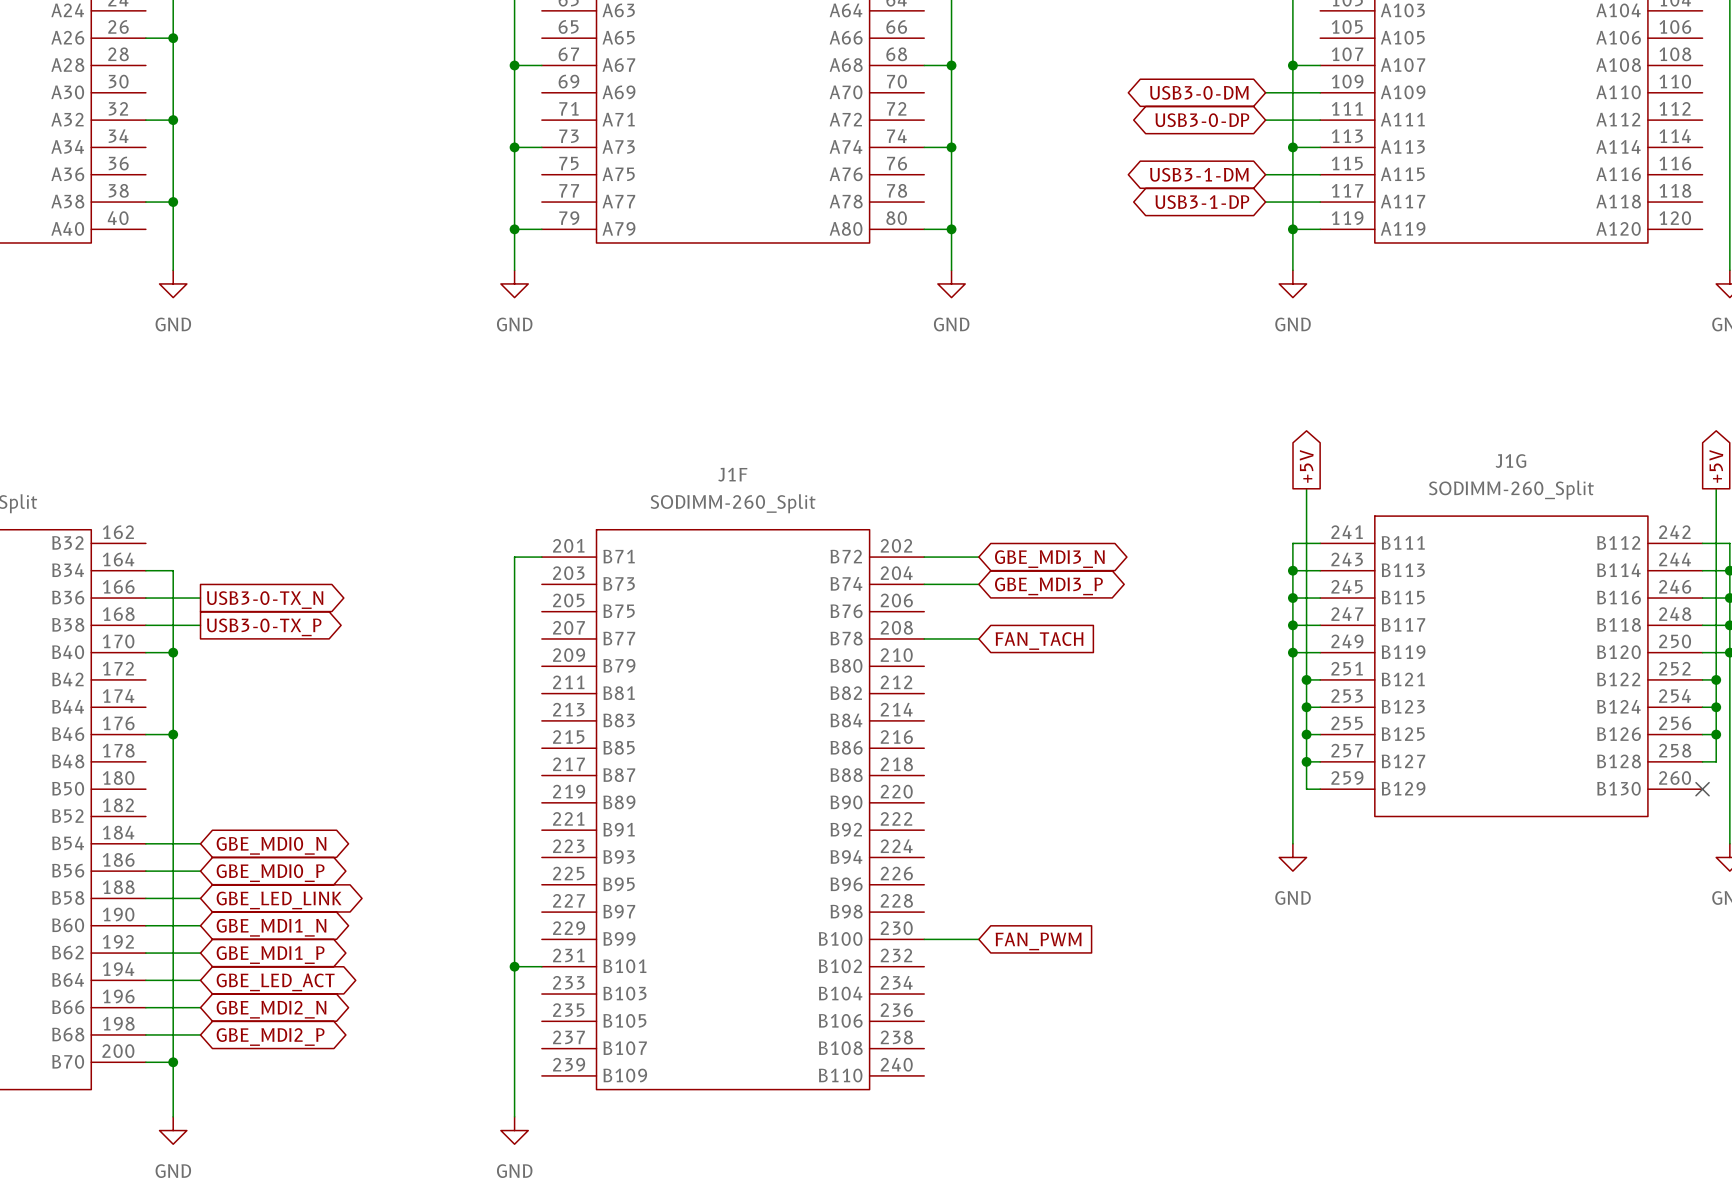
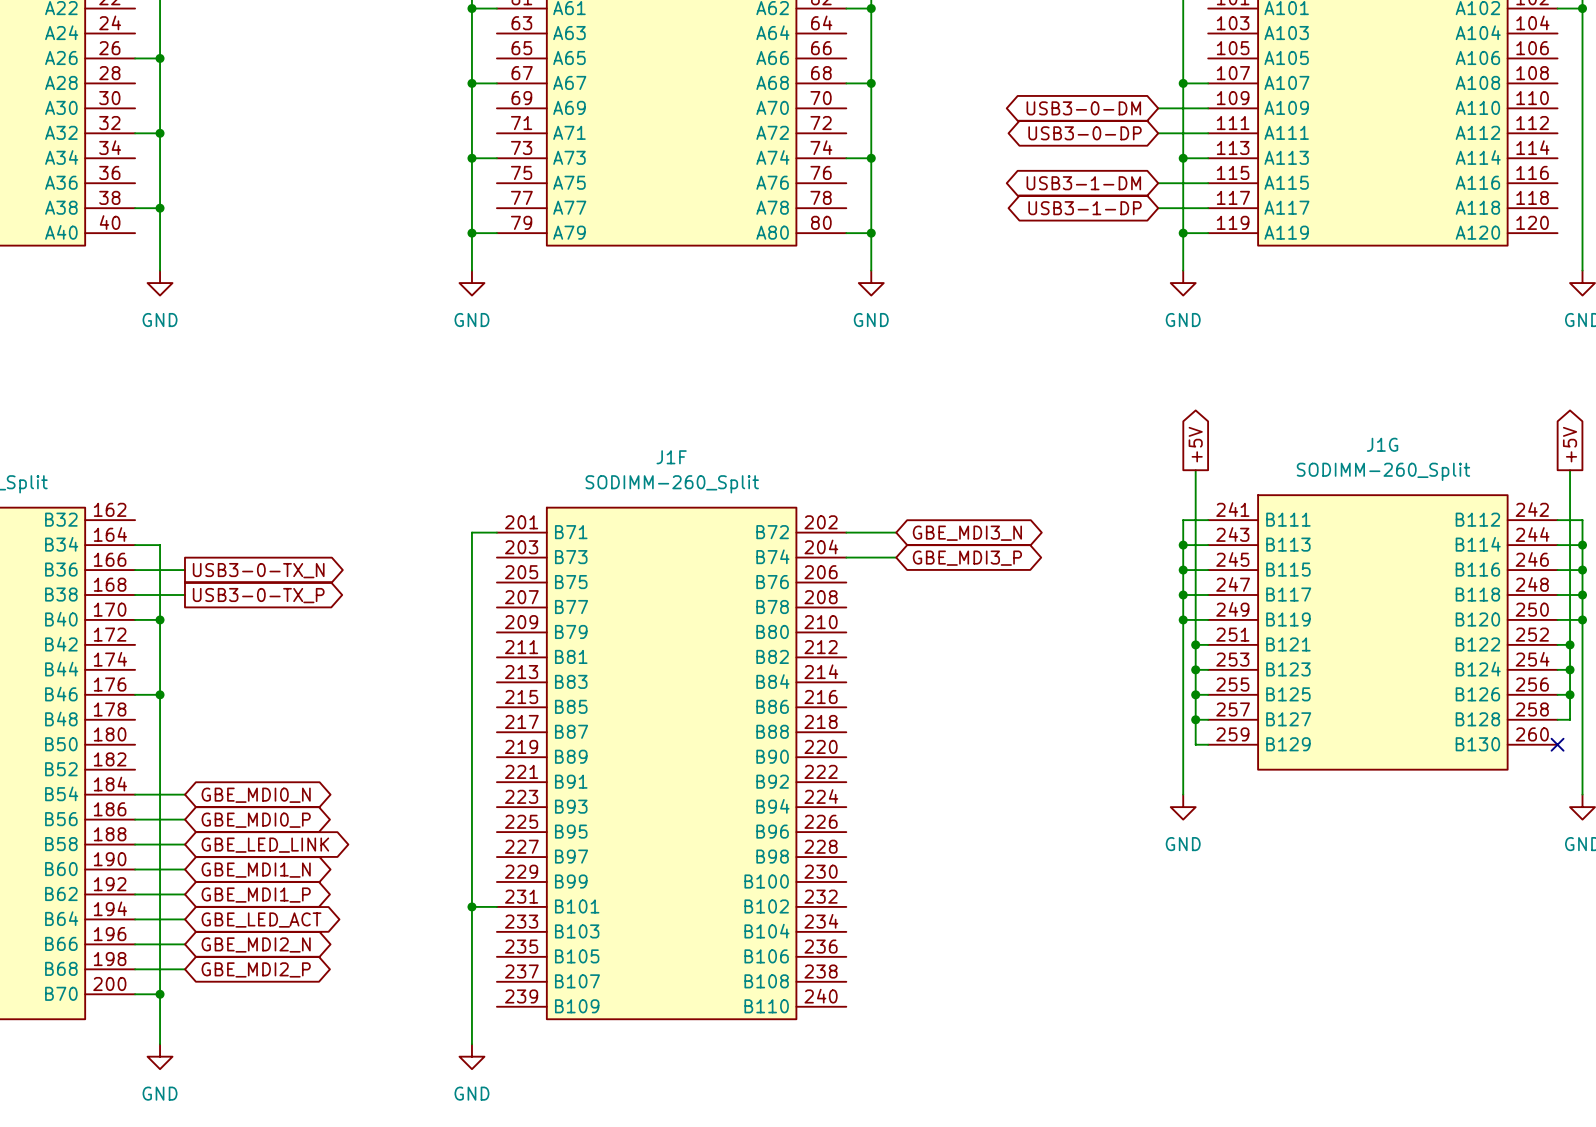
wire: (924, 638) (978, 638) -> none
global label: FAN_TACH (1039, 641) -> none
wire: (924, 939) (978, 939) -> none
global label: FAN_PWM (1038, 941) -> none

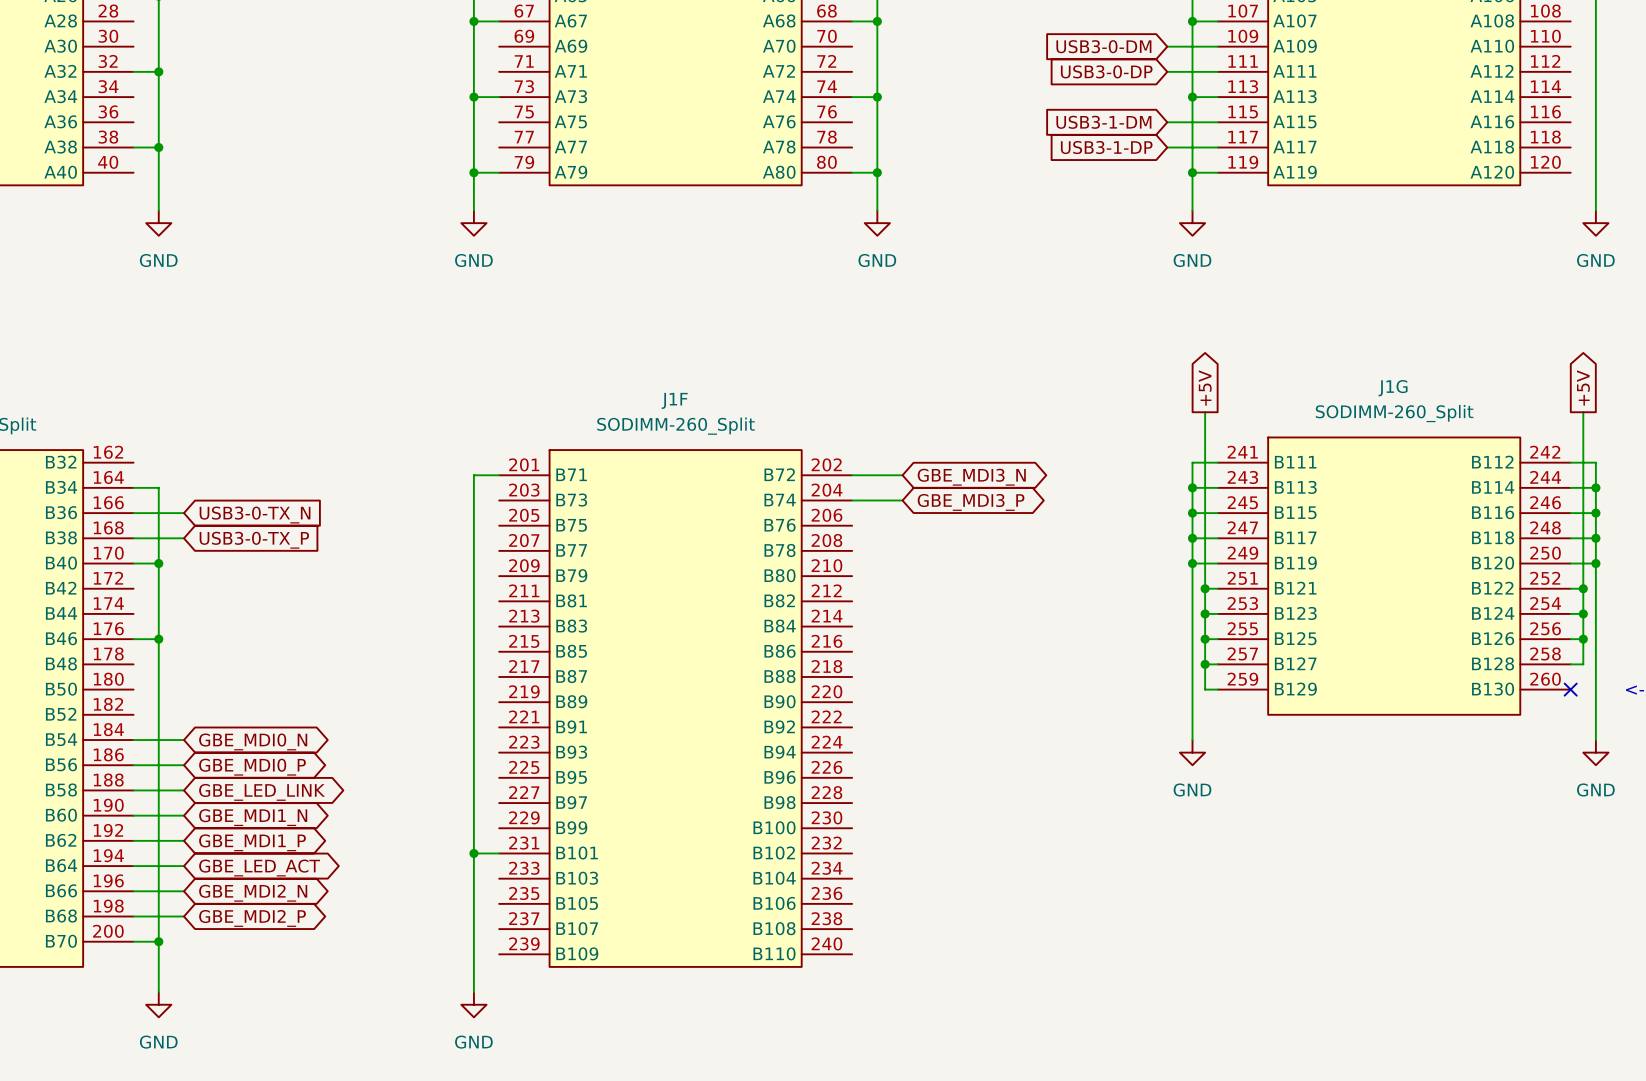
global label shape: bidirectional (1083, 108) -> input (1103, 46)
global label shape: bidirectional (1085, 133) -> input (1106, 71)
global label shape: bidirectional (1083, 183) -> input (1103, 122)
global label shape: bidirectional (1085, 208) -> input (1106, 147)
global label shape: output (258, 570) -> input (255, 515)
global label shape: output (258, 595) -> input (254, 540)

